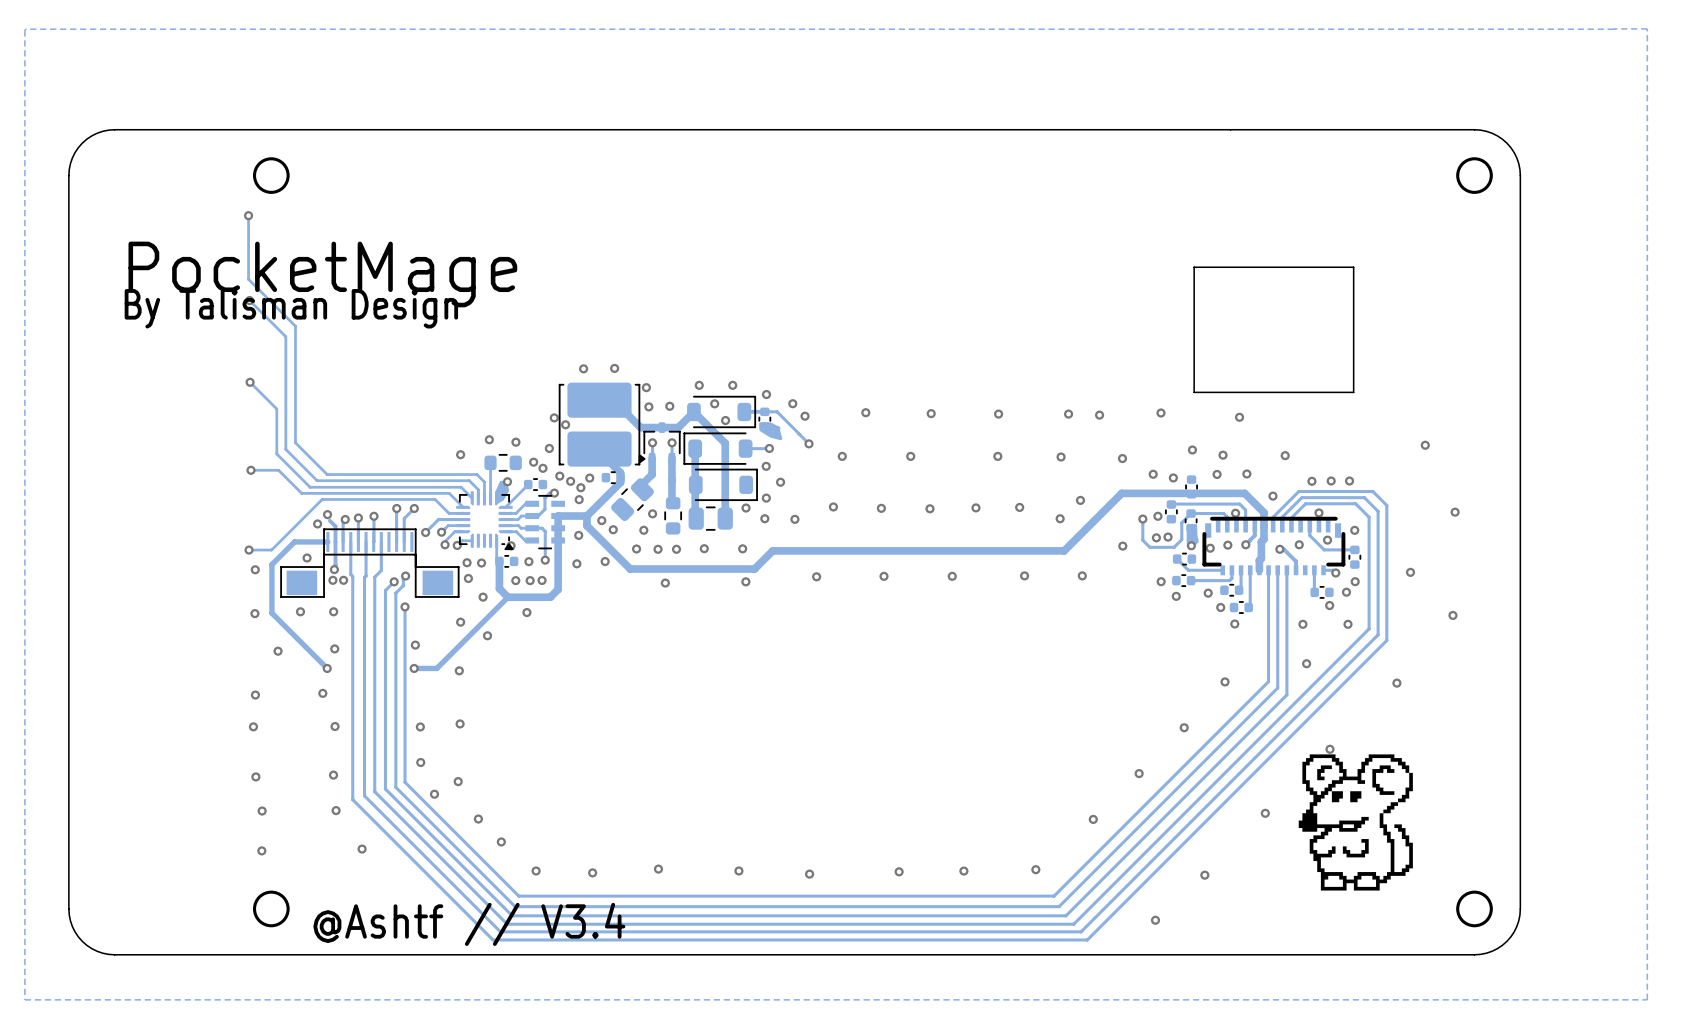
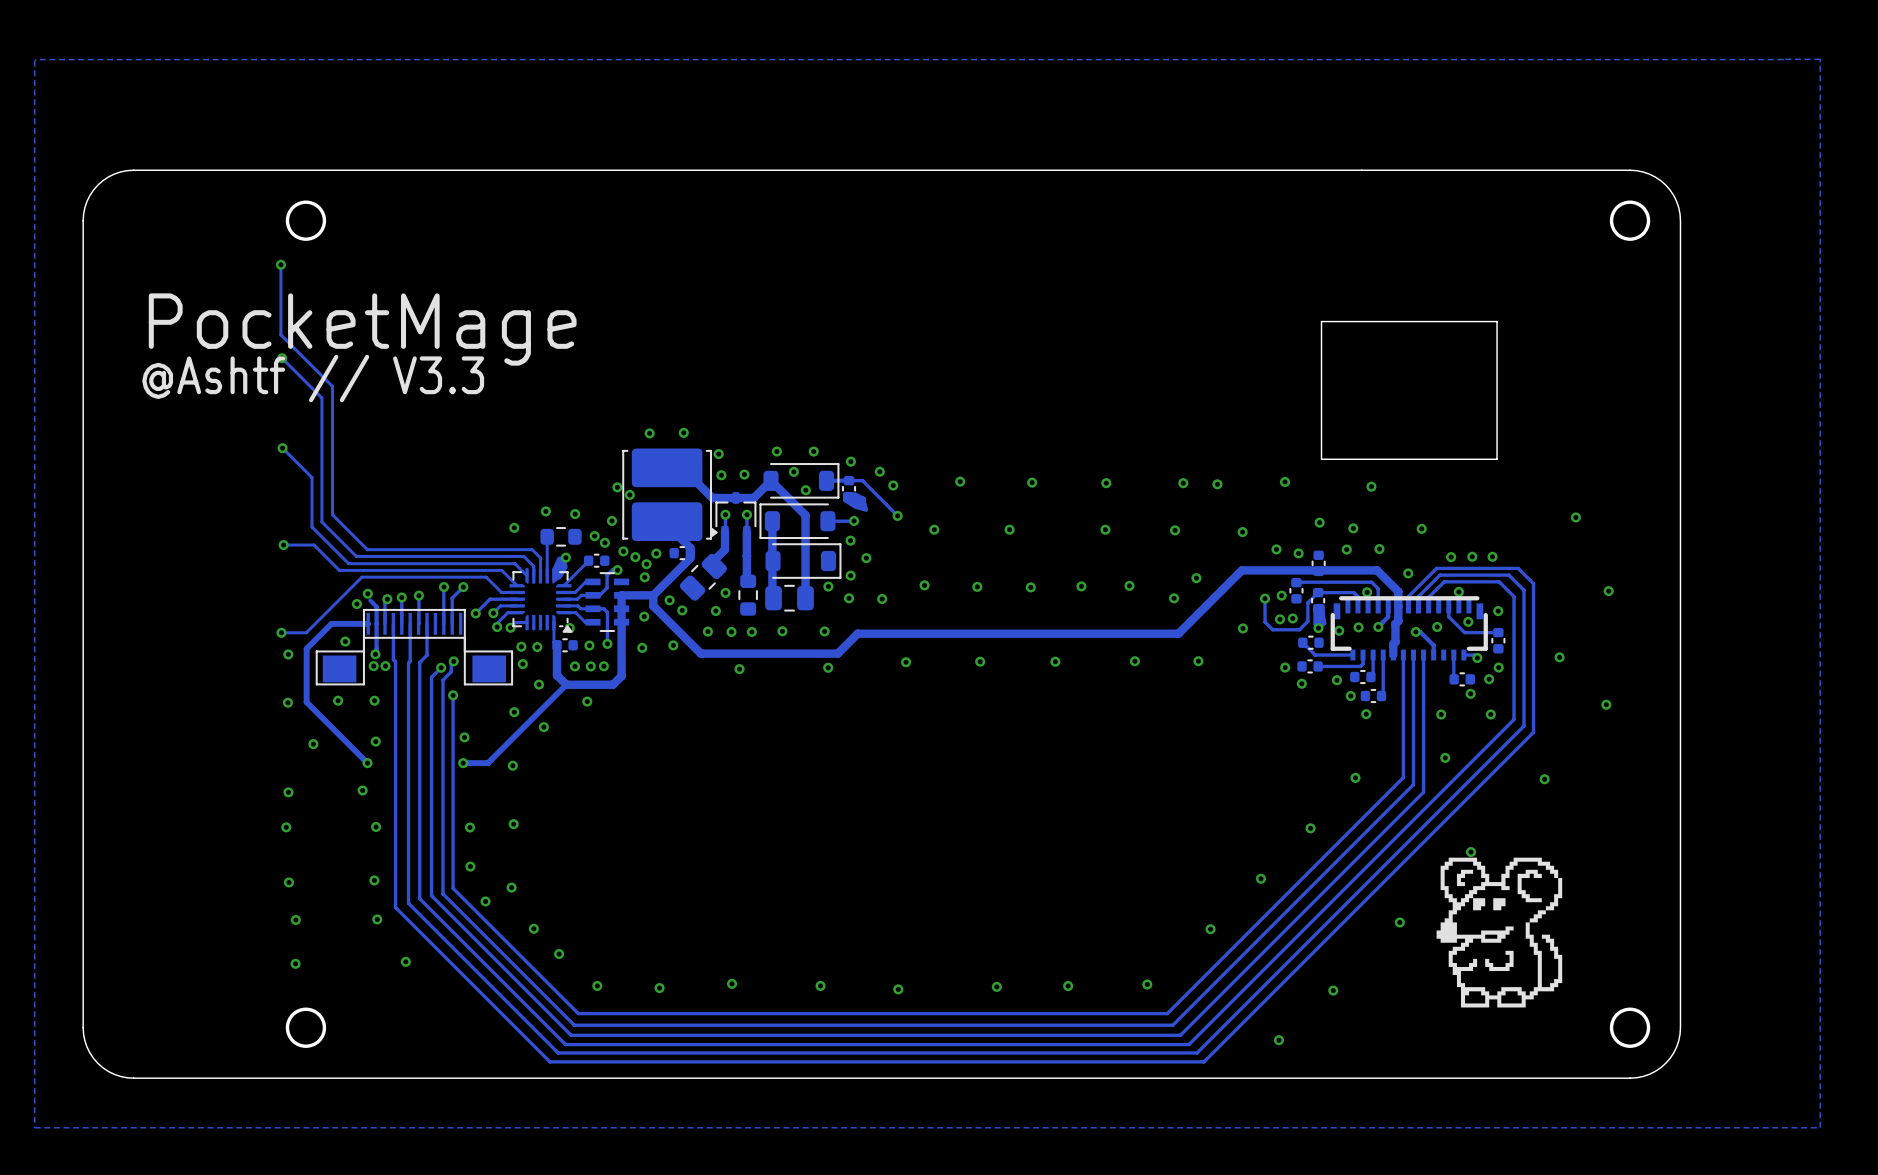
text: By Talisman Design (291, 308) -> @Ashtf // V3.3 (313, 378)
text: @Ashtf // V3.4 (469, 924) -> none

